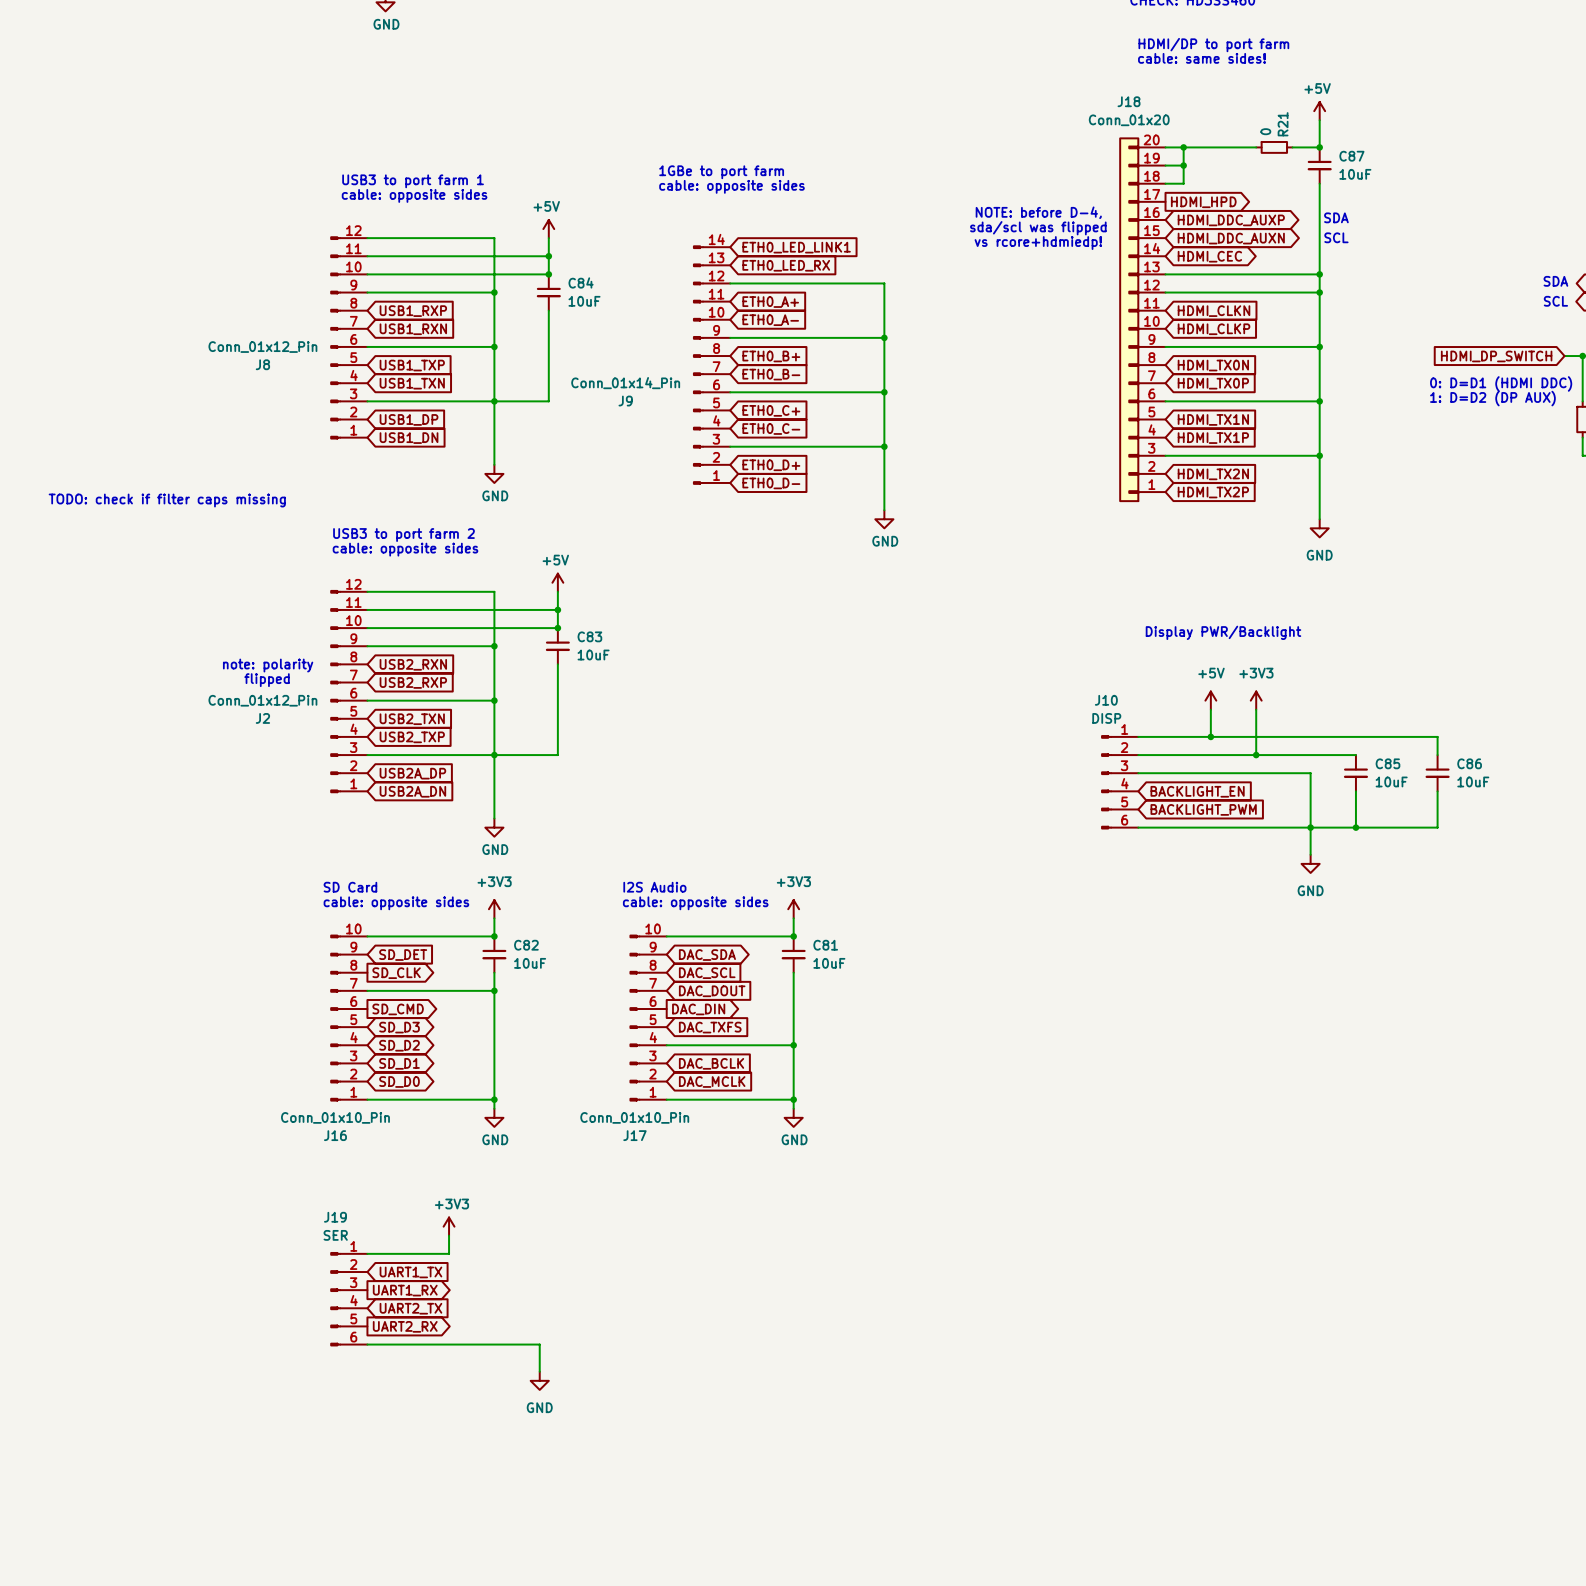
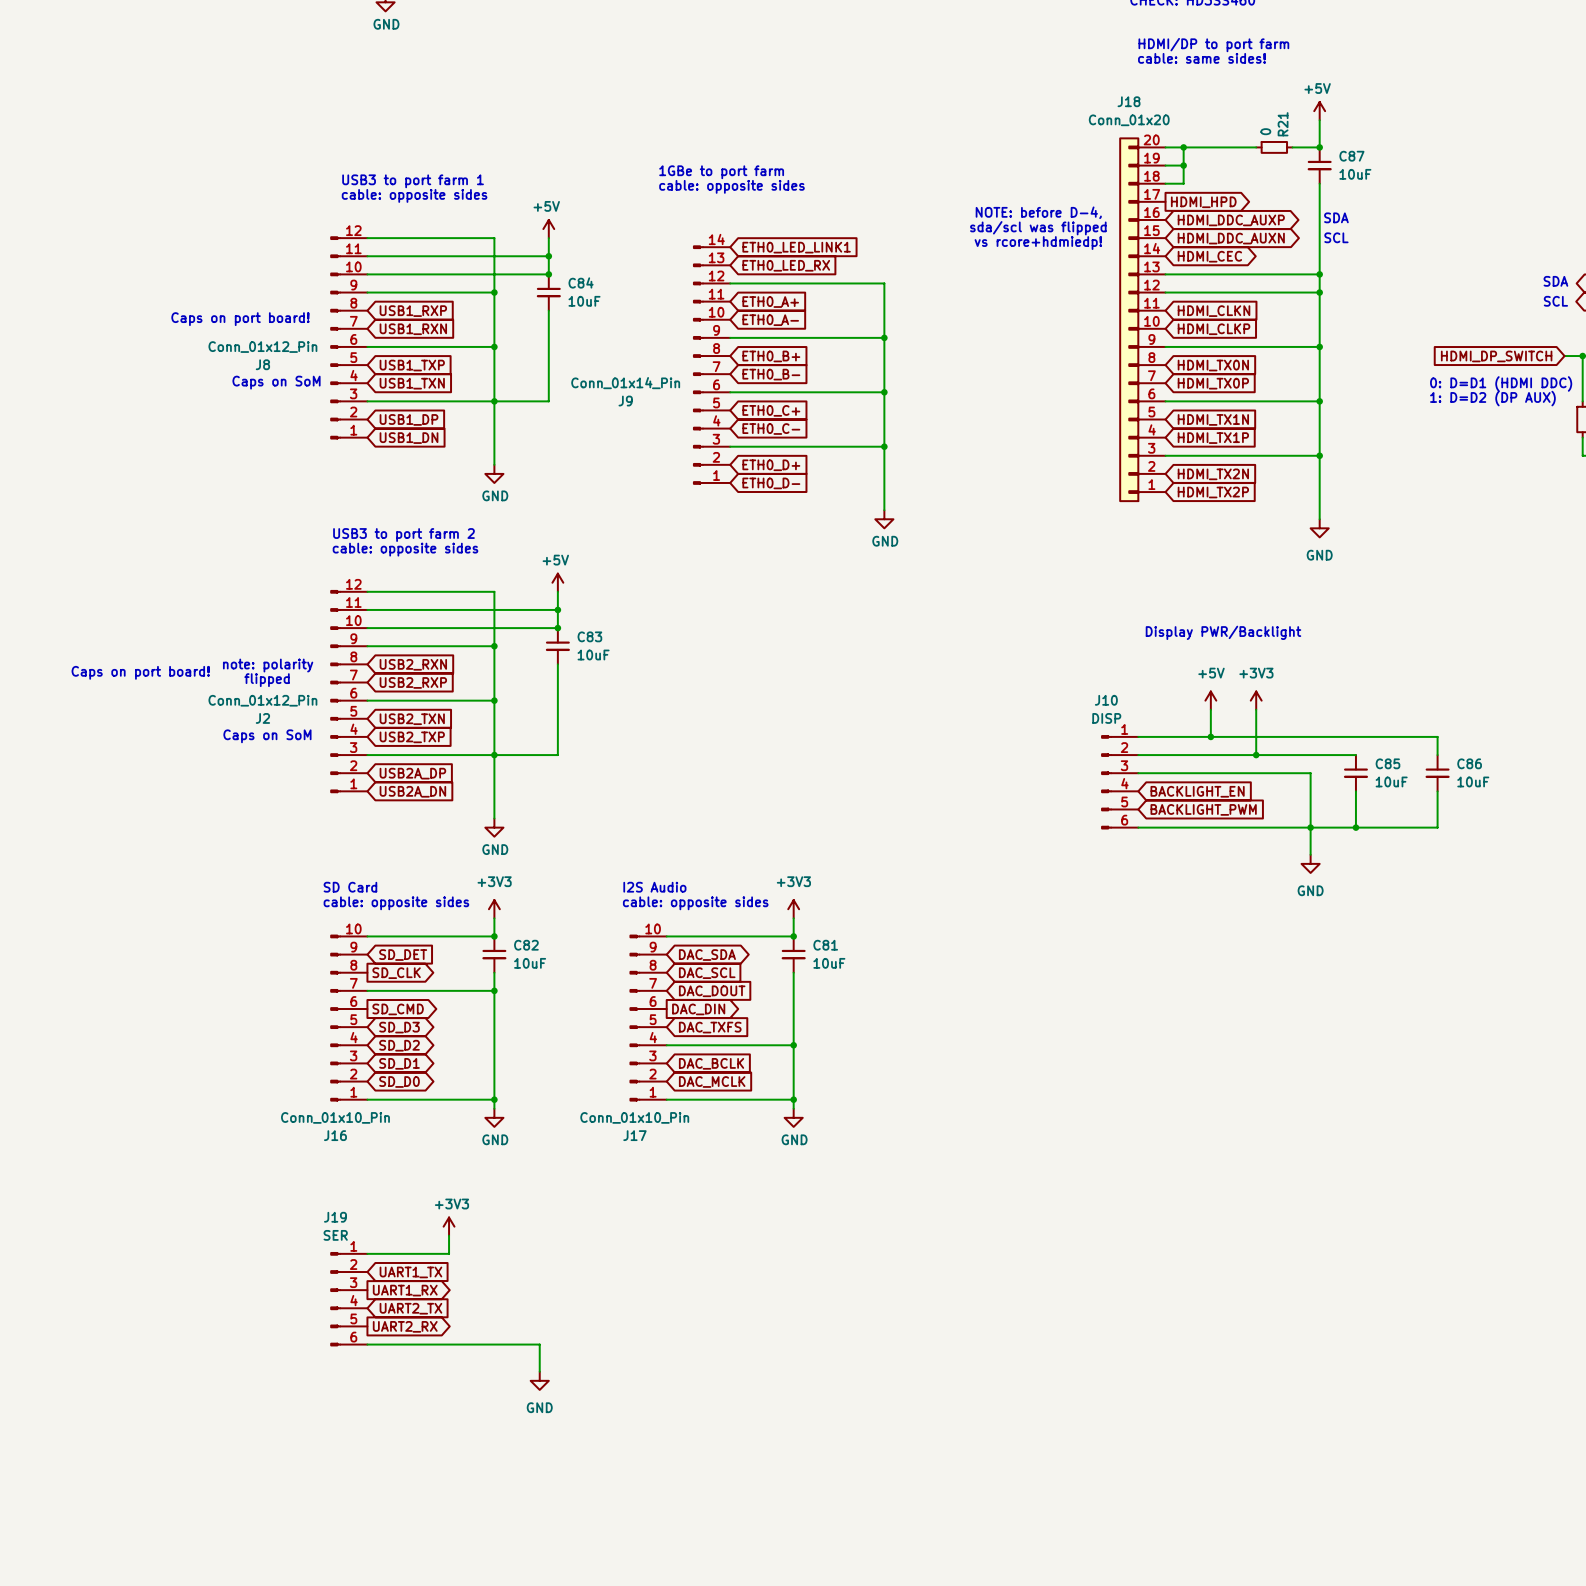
text: none -> Caps on port board! (240, 319)
text: none -> Caps on SoM (276, 382)
text: TODO: check if filter caps missing (167, 500) -> none
text: none -> Caps on port board! (140, 672)
text: none -> Caps on SoM (267, 736)

